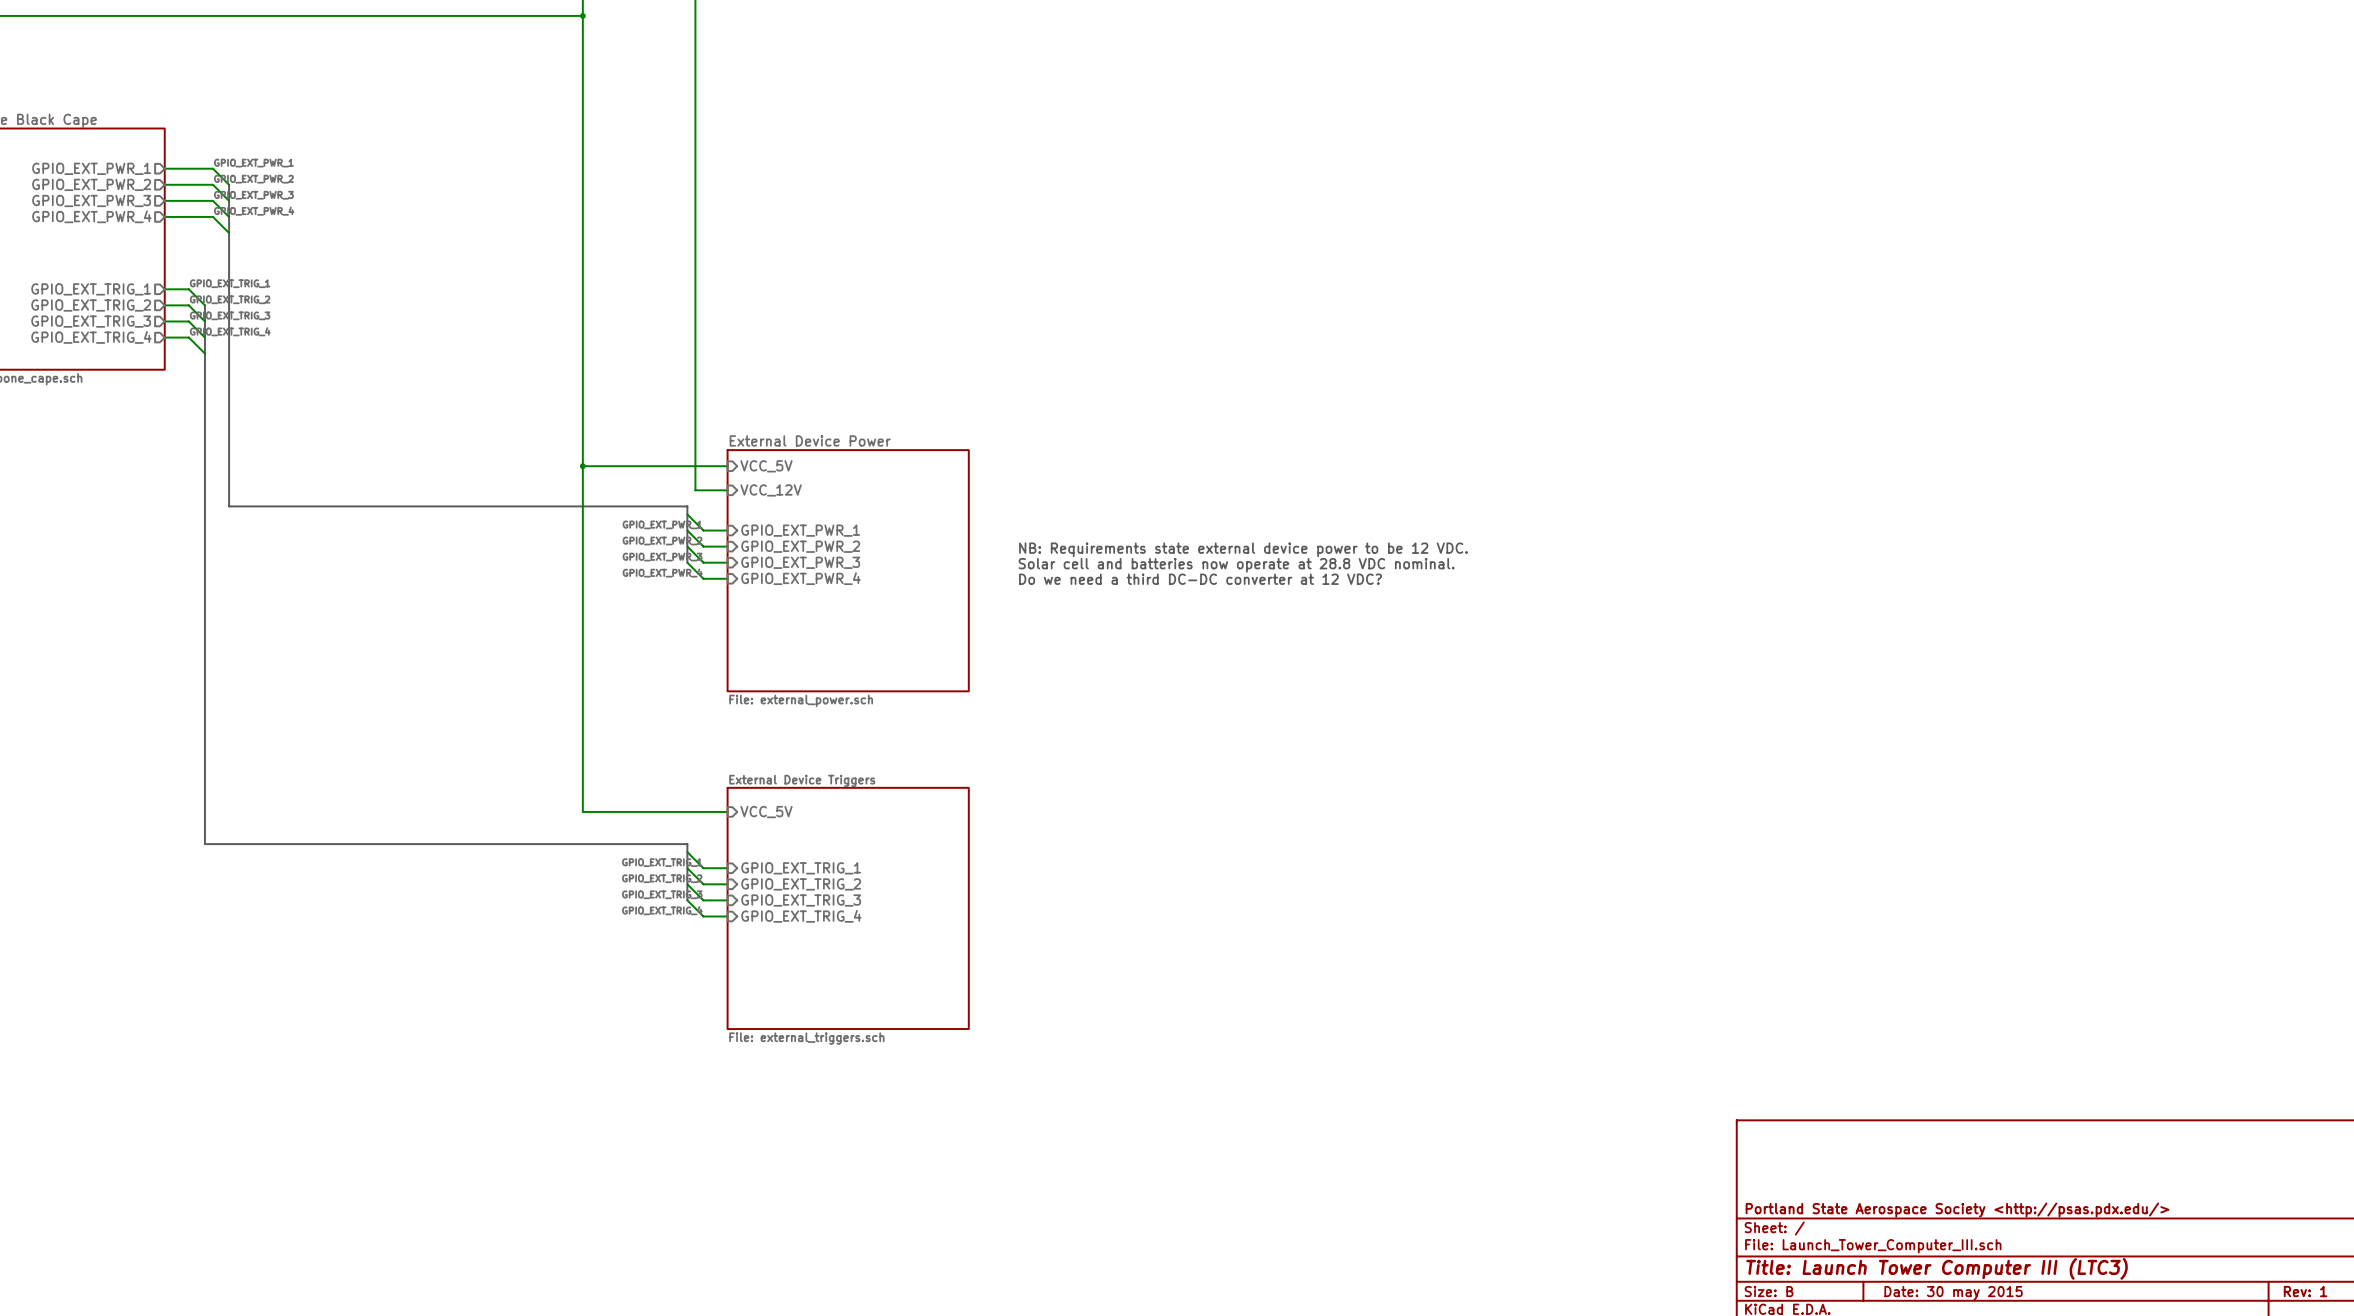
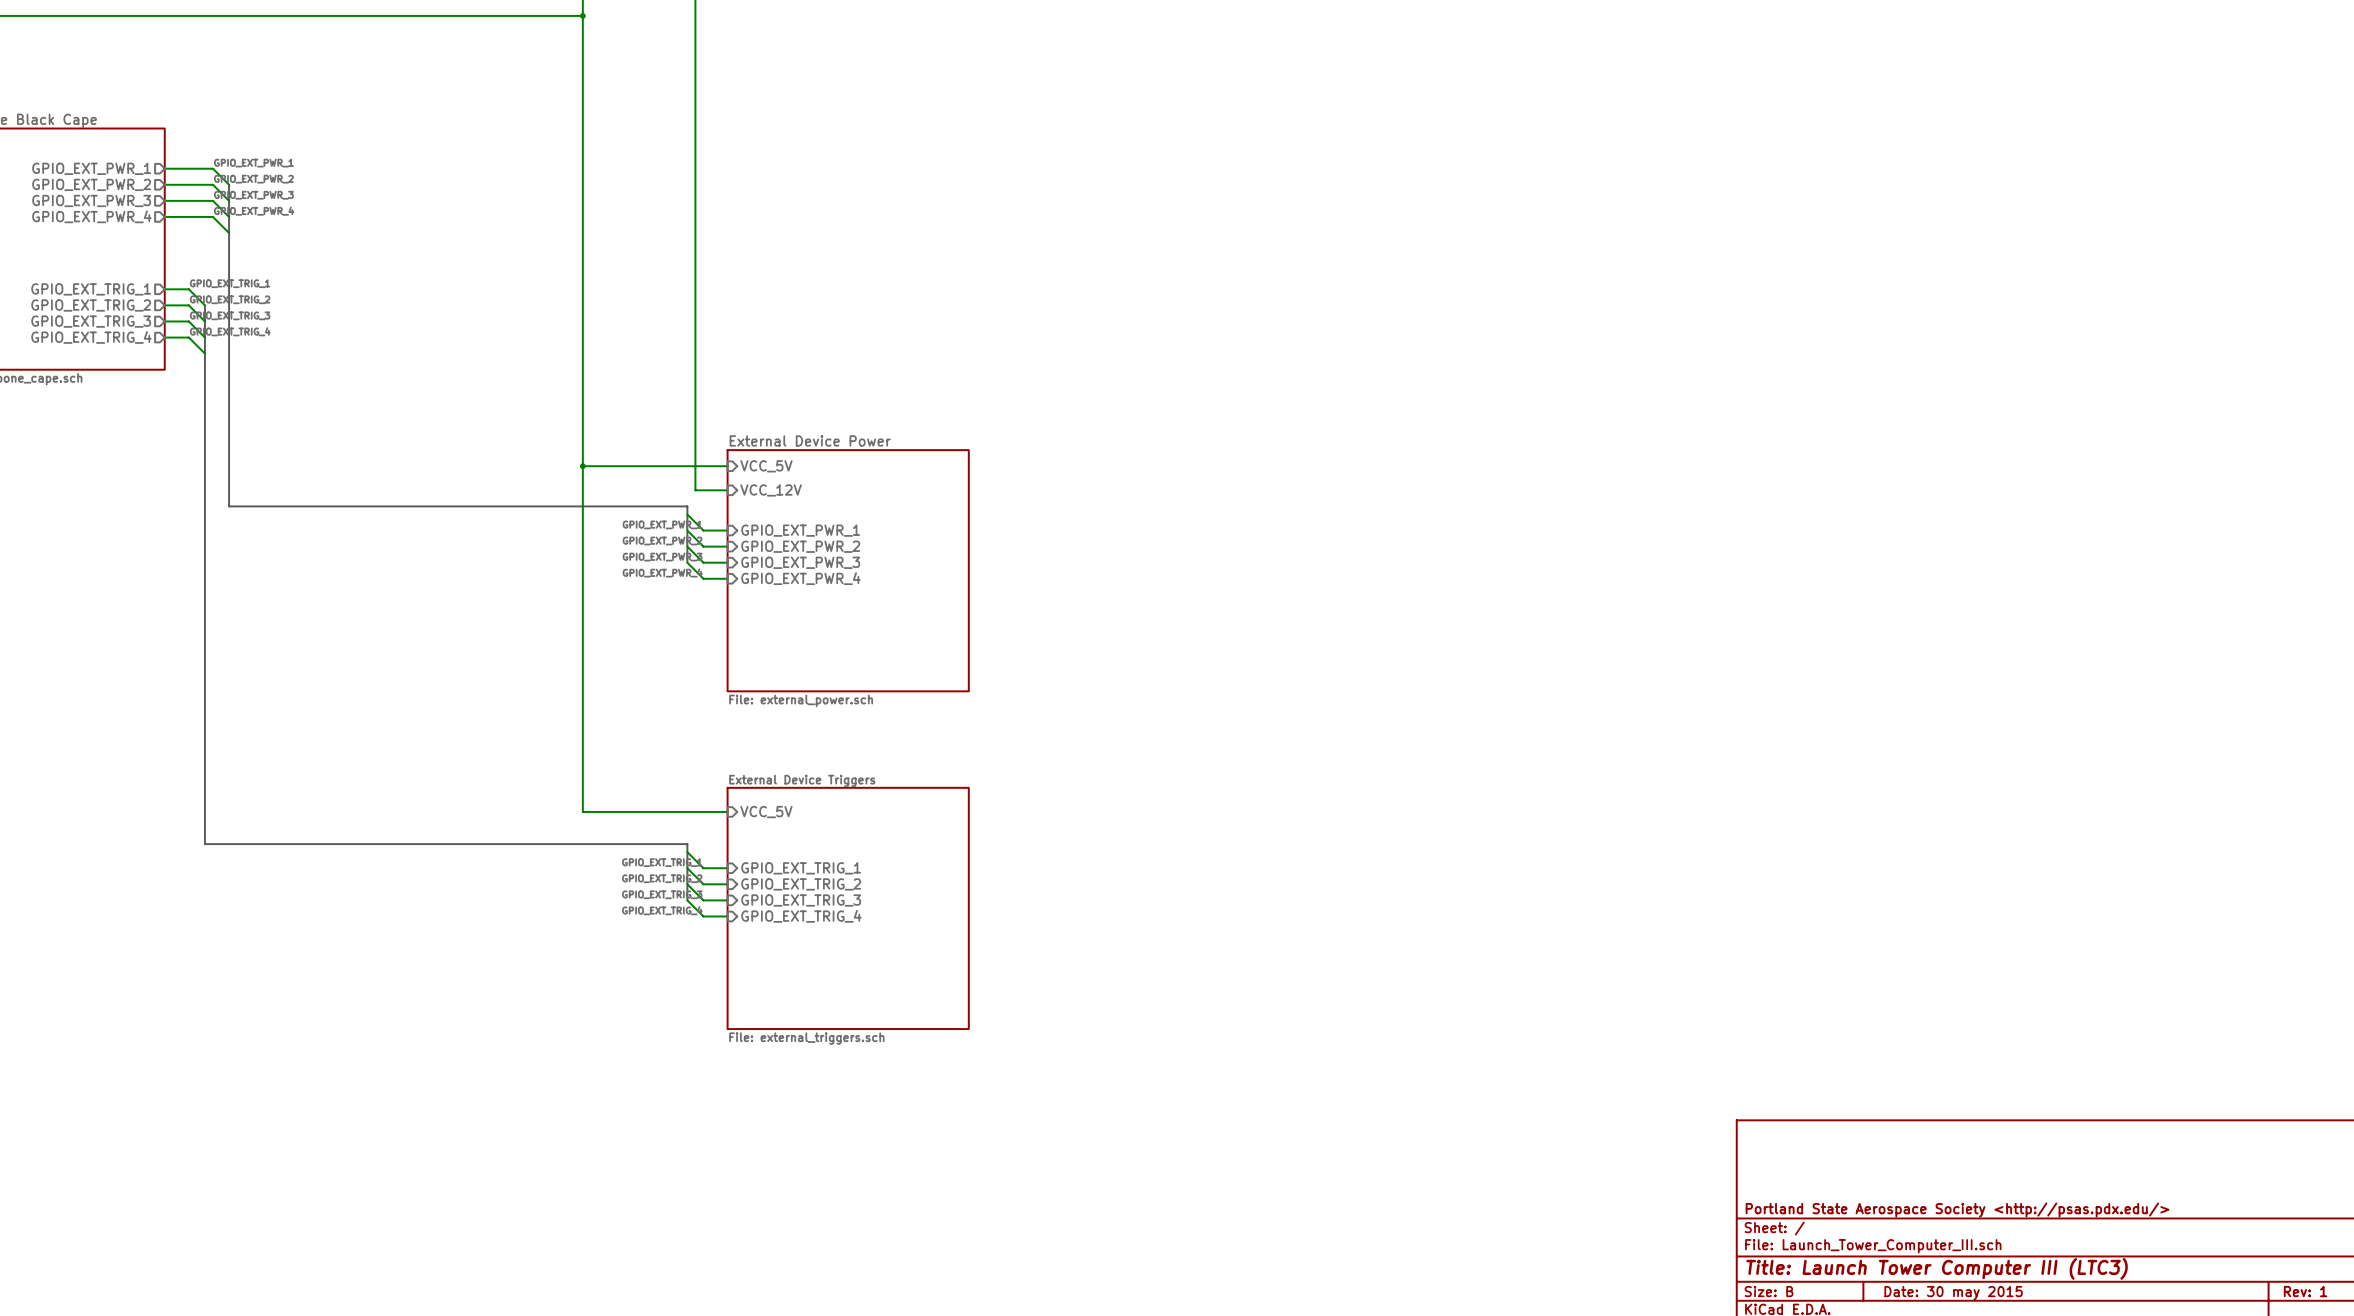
text: NB: Requirements state external device power to be 12 VDC. (1243, 549) -> none
text: Solar cell and batteries now operate at 28.8 VDC nominal. (1236, 565) -> none
text: Do we need a third DC-DC converter at 12 VDC? (1200, 579) -> none

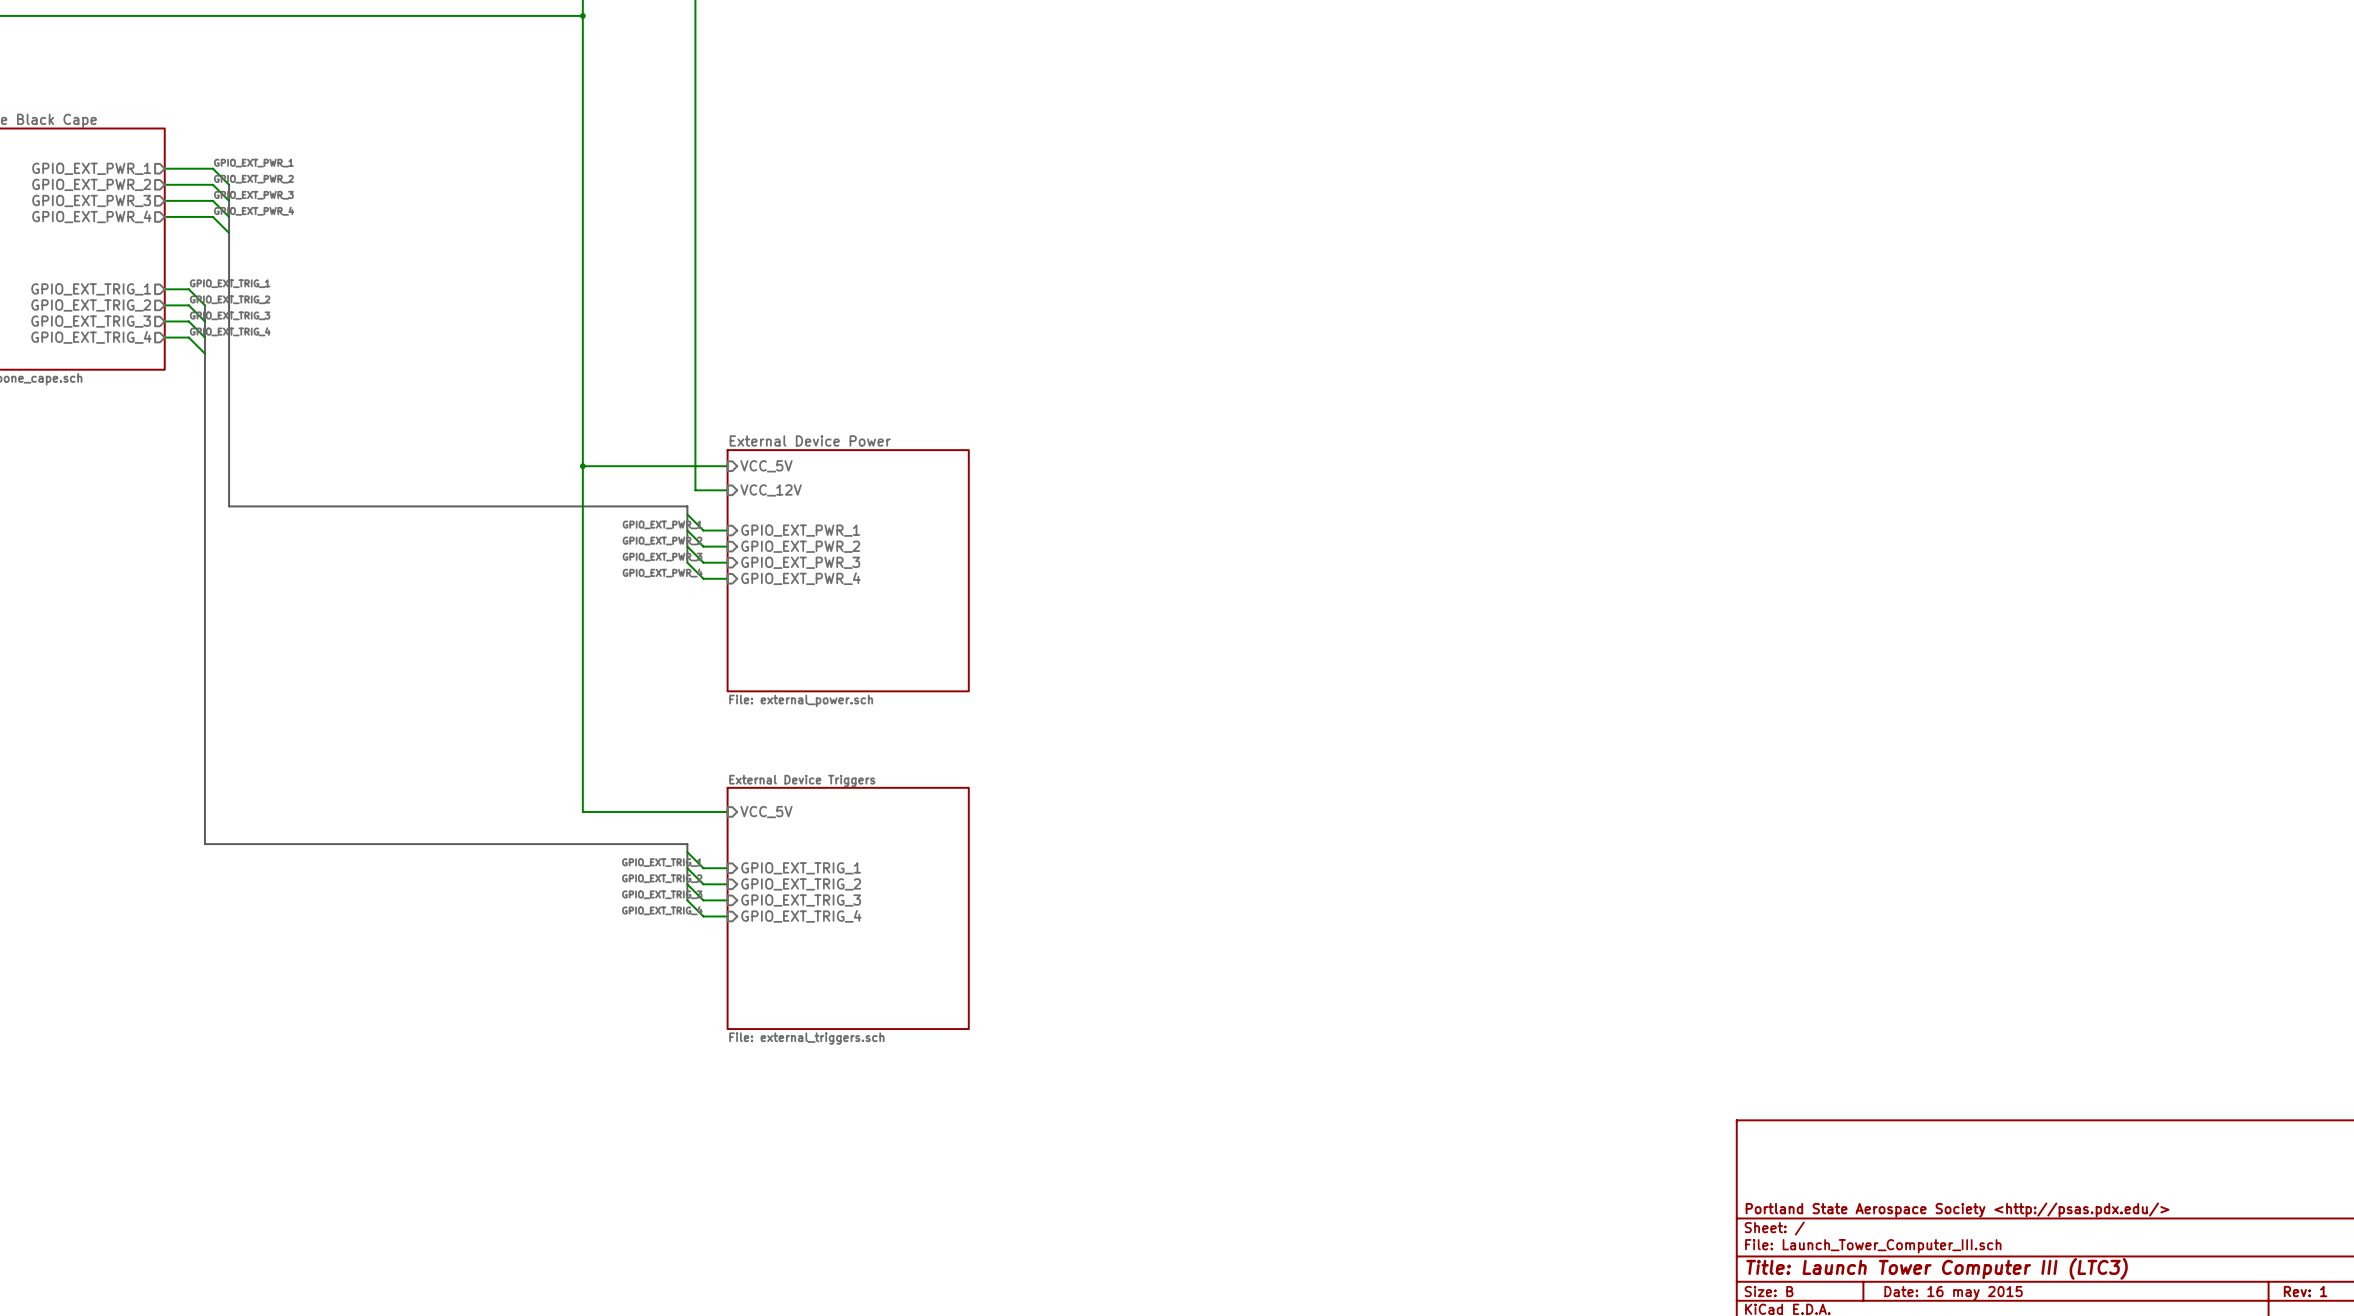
title block: Date: 30 may 2015 (1953, 1293) -> Date: 16 may 2015 (1953, 1293)

